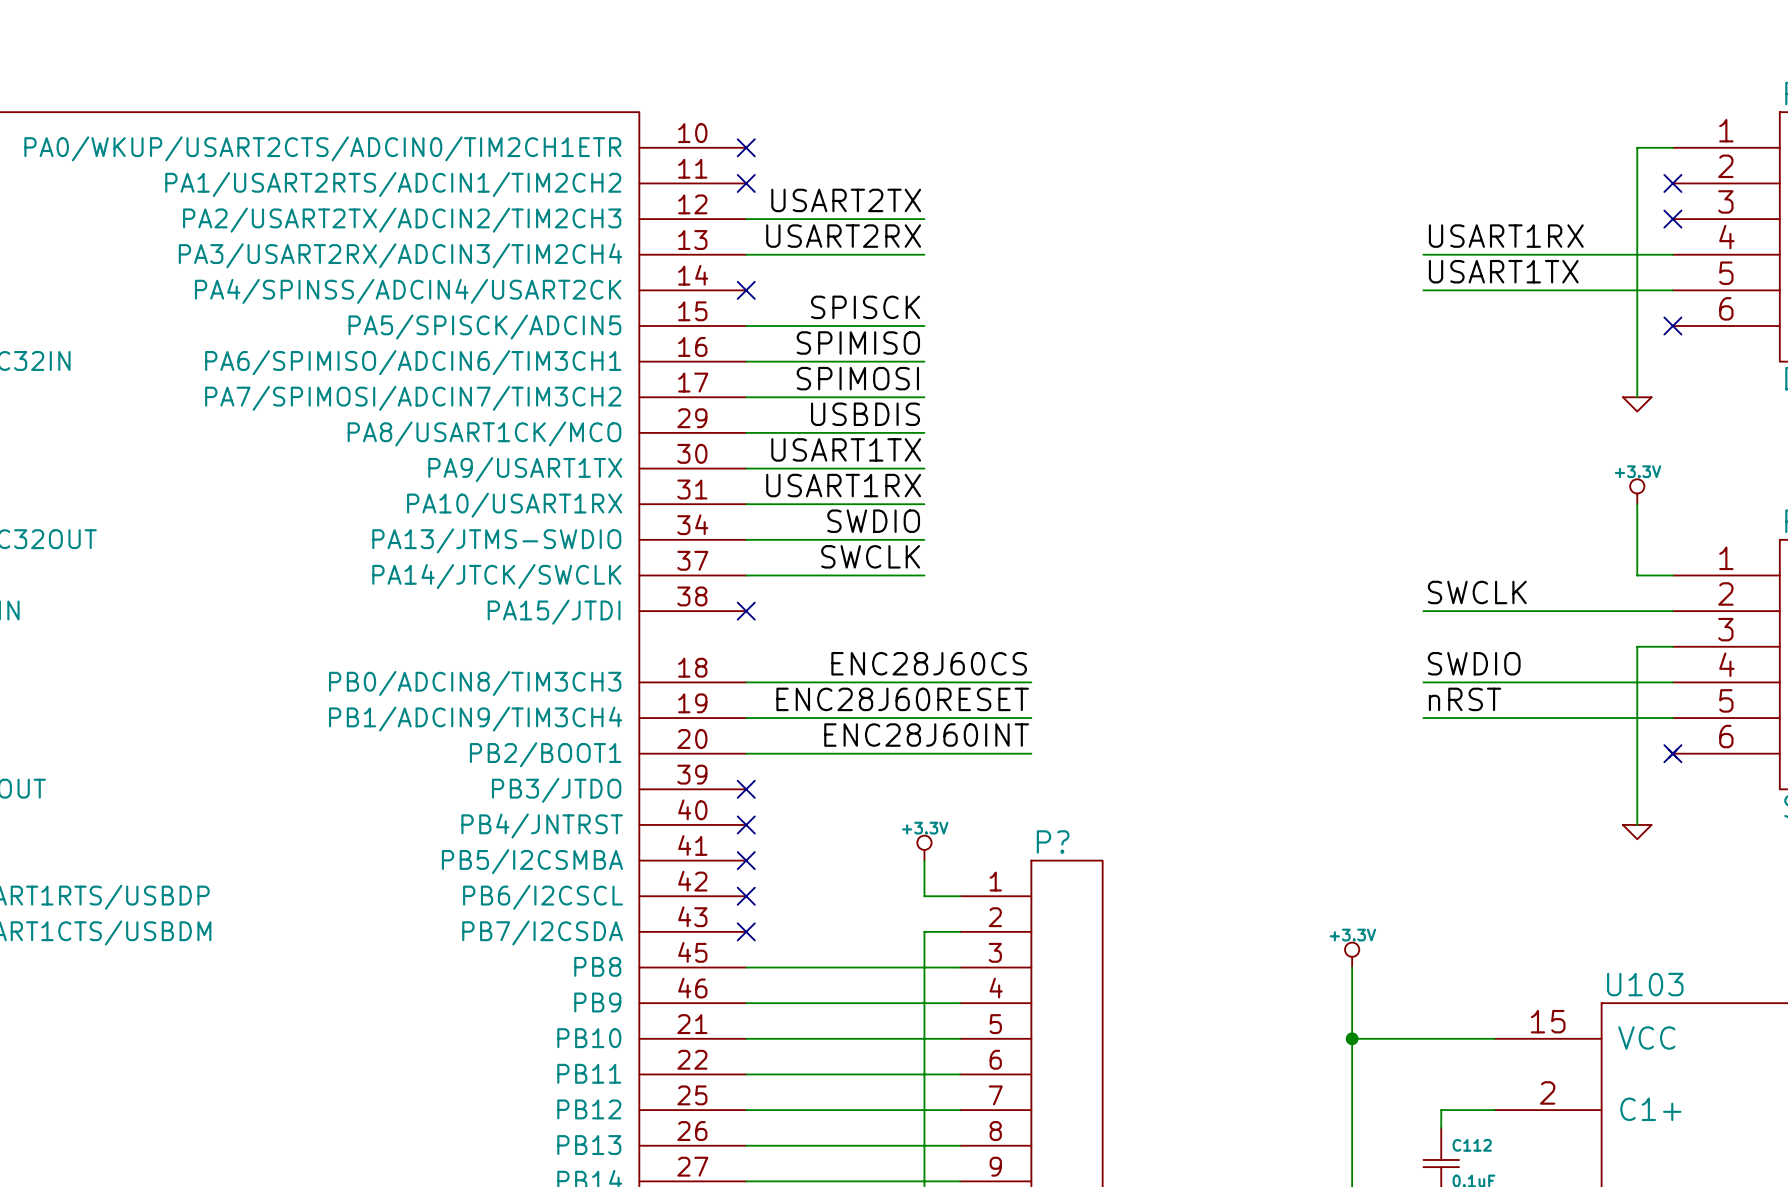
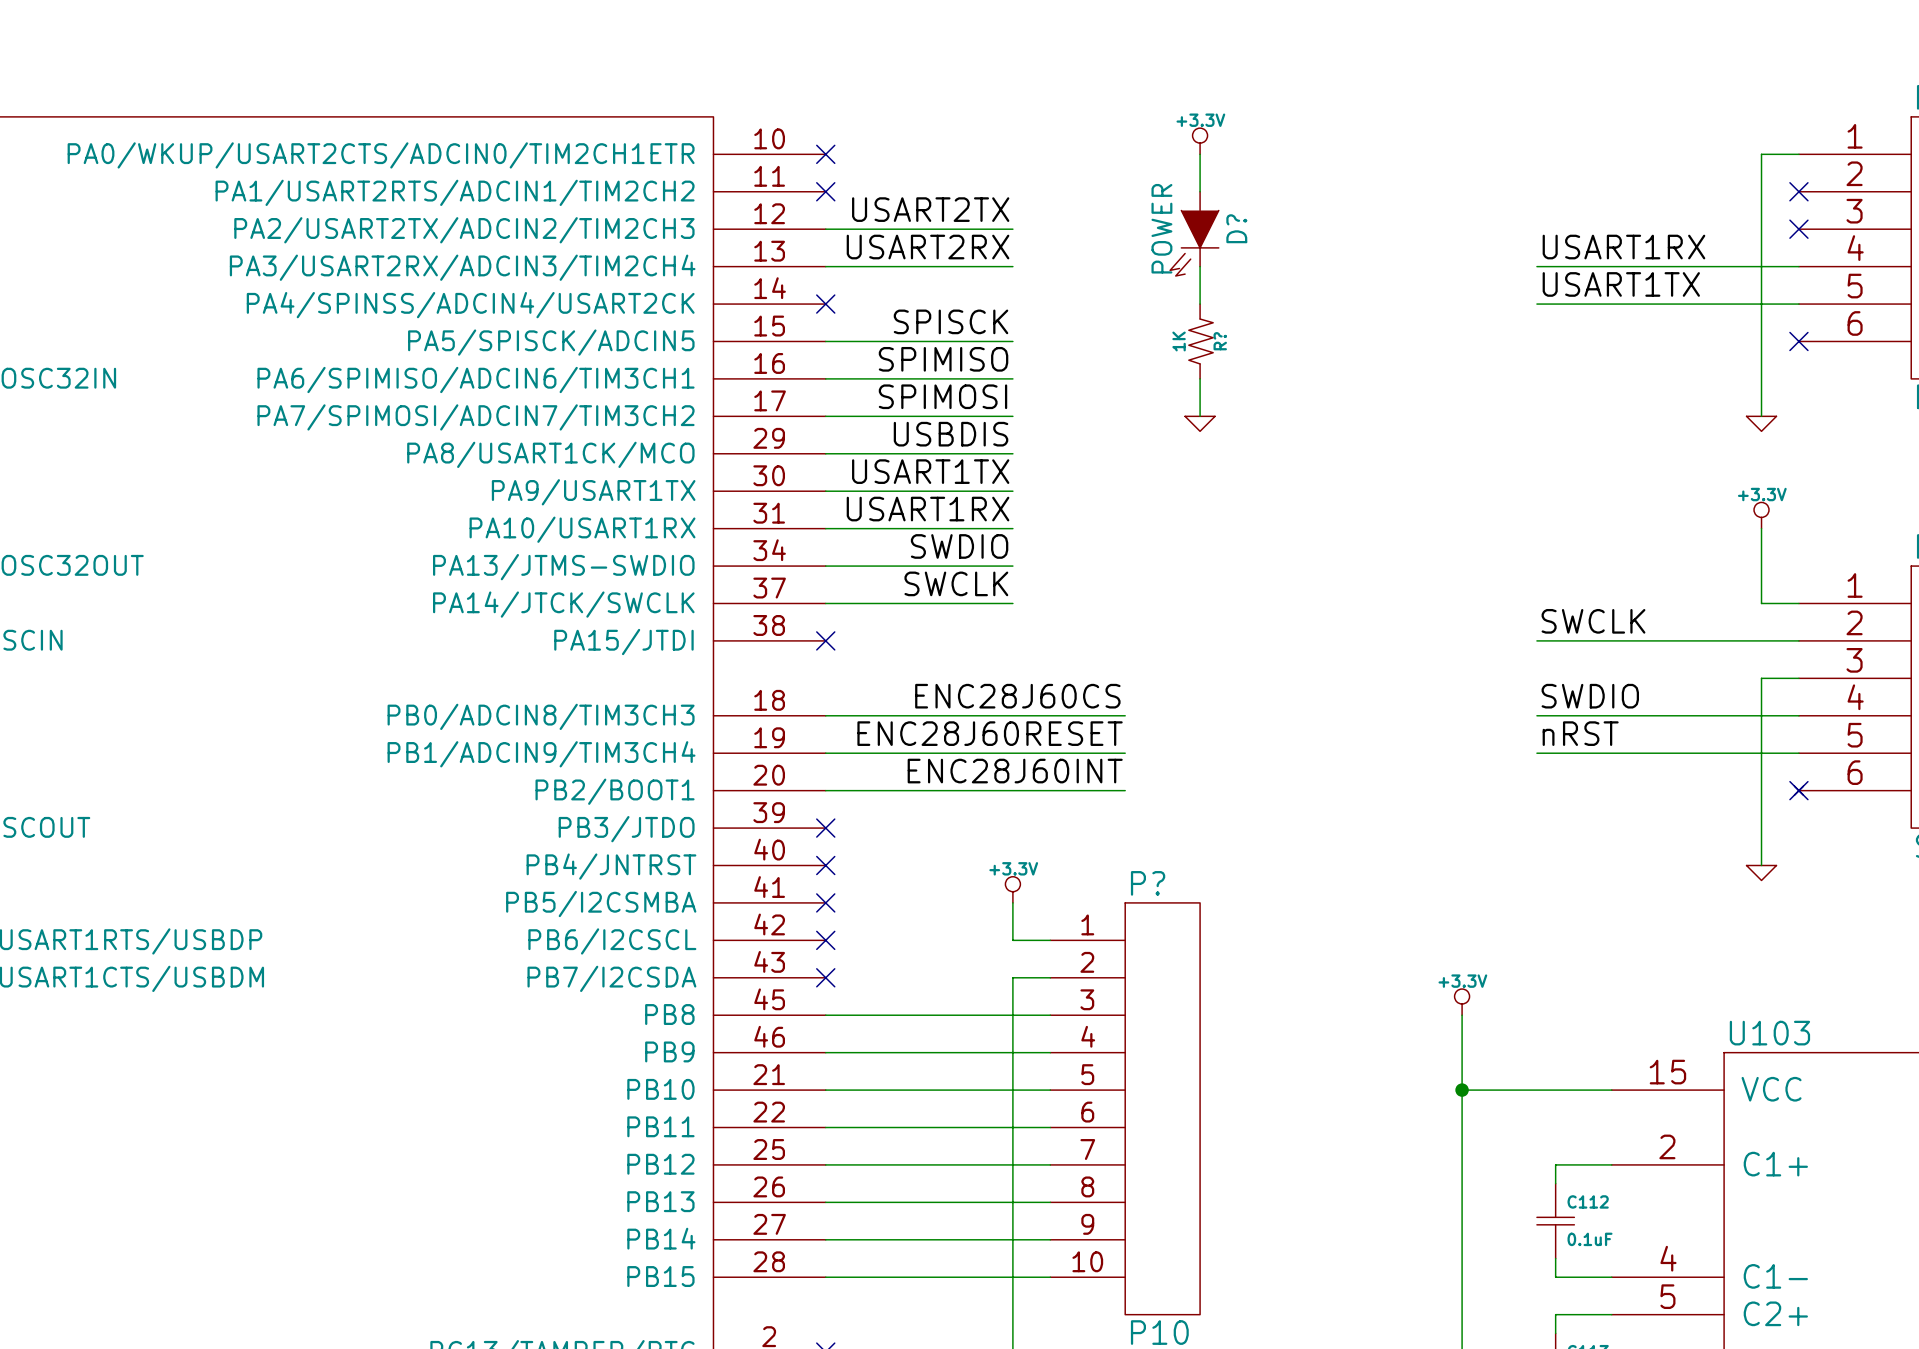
power symbol: none -> +3.3V (1200, 141)
wire: none -> (1200, 154) (1200, 191)
D?: none -> POWER (1194, 233)
wire: none -> (1200, 266) (1200, 304)
R?: none -> 1K (1201, 341)
wire: none -> (1200, 378) (1200, 416)
power symbol: none -> (1200, 423)

